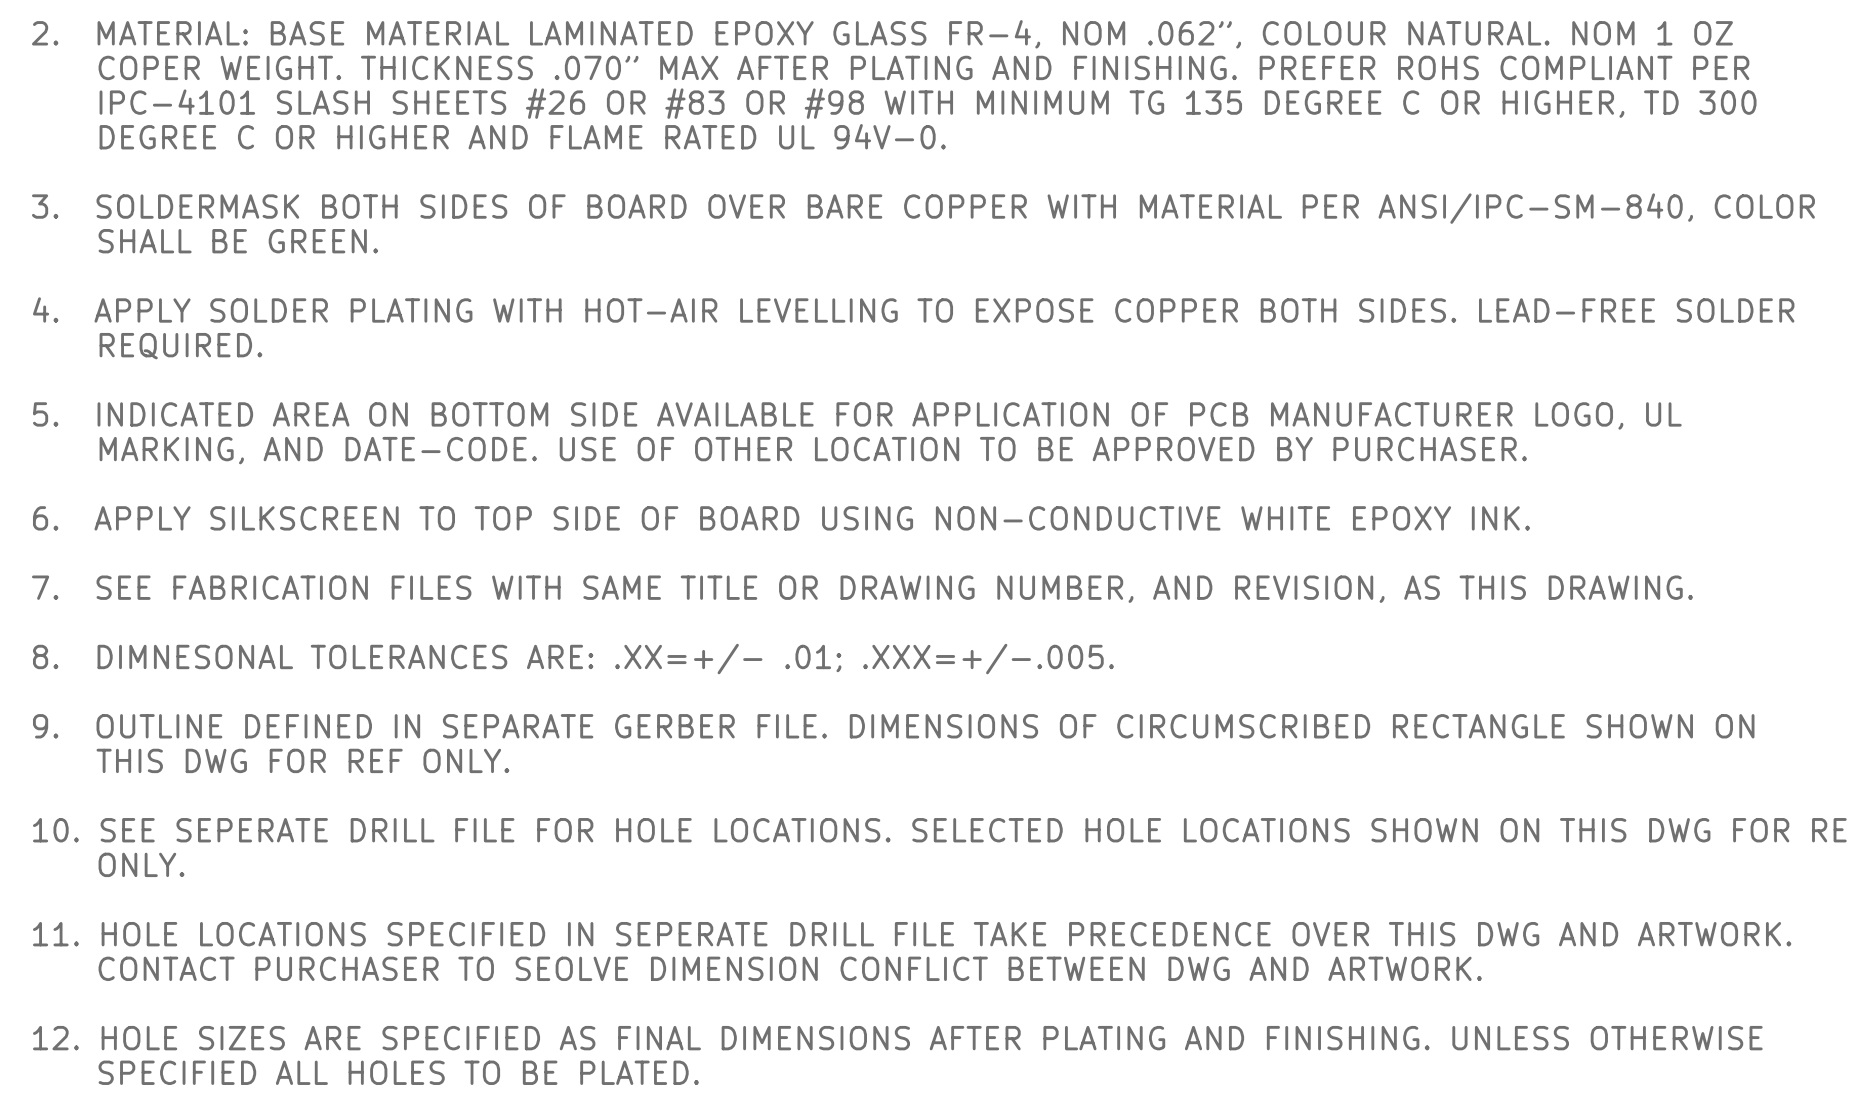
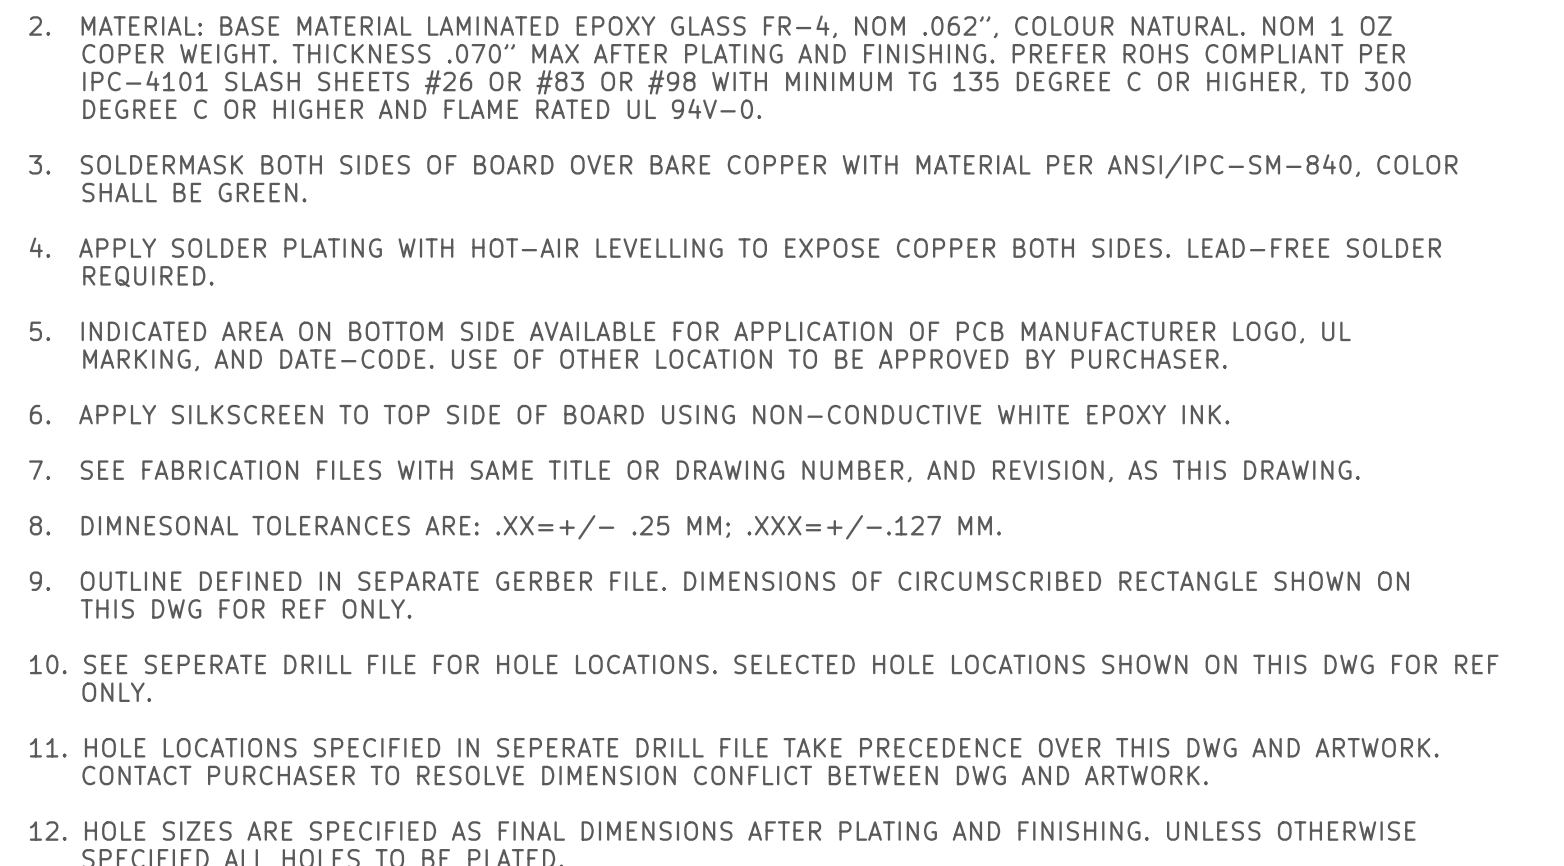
text: 8. DIMNESONAL TOLERANCES ARE: .XX=+/- .01; .XXX=+/-.005. (573, 659) -> 8. DIMNESONAL TOLERANCES ARE: .XX=+/- .25 MM; .XXX=+/-.127 MM. (515, 527)
text: CONTACT PURCHASER TO SEOLVE DIMENSION CONFLICT BETWEEN DWG AND ARTWORK. (790, 968) -> CONTACT PURCHASER TO RESOLVE DIMENSION CONFLICT BETWEEN DWG AND ARTWORK. (645, 775)

